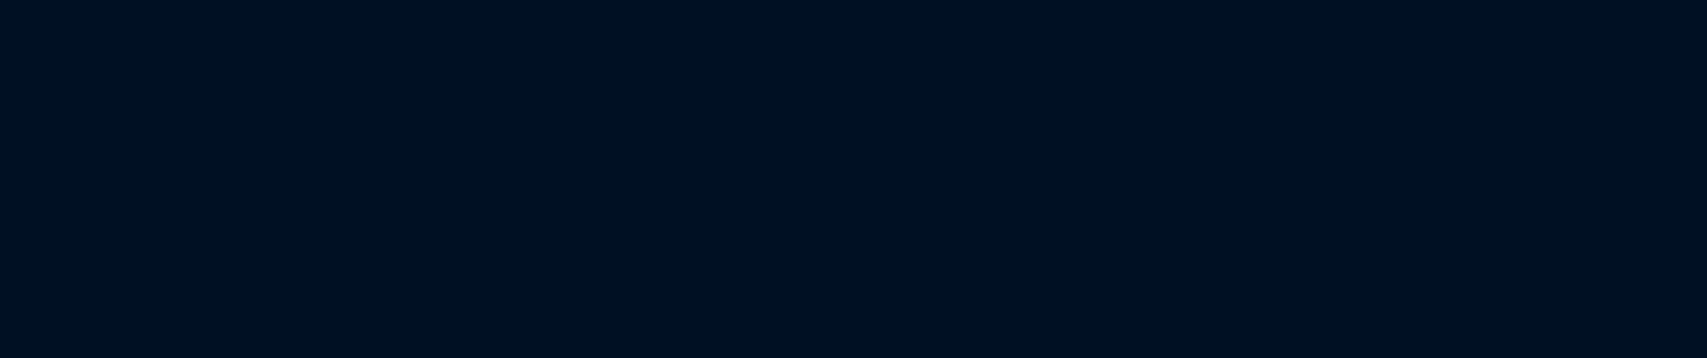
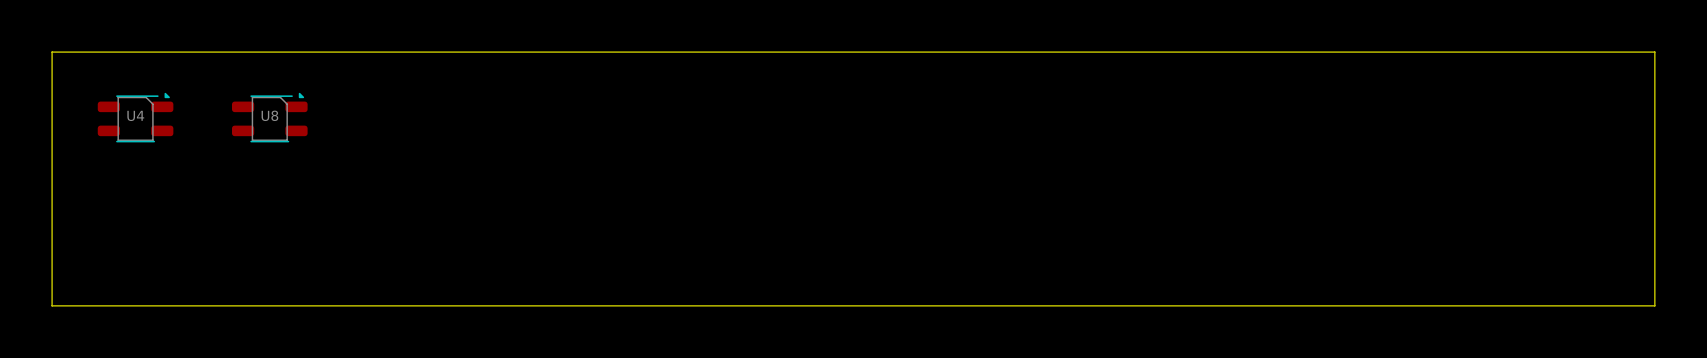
board edge: none -> (52, 52) (1654, 52) (1654, 305) (52, 305) (52, 52)
U4: none -> (135, 117)
U8: none -> (269, 117)

